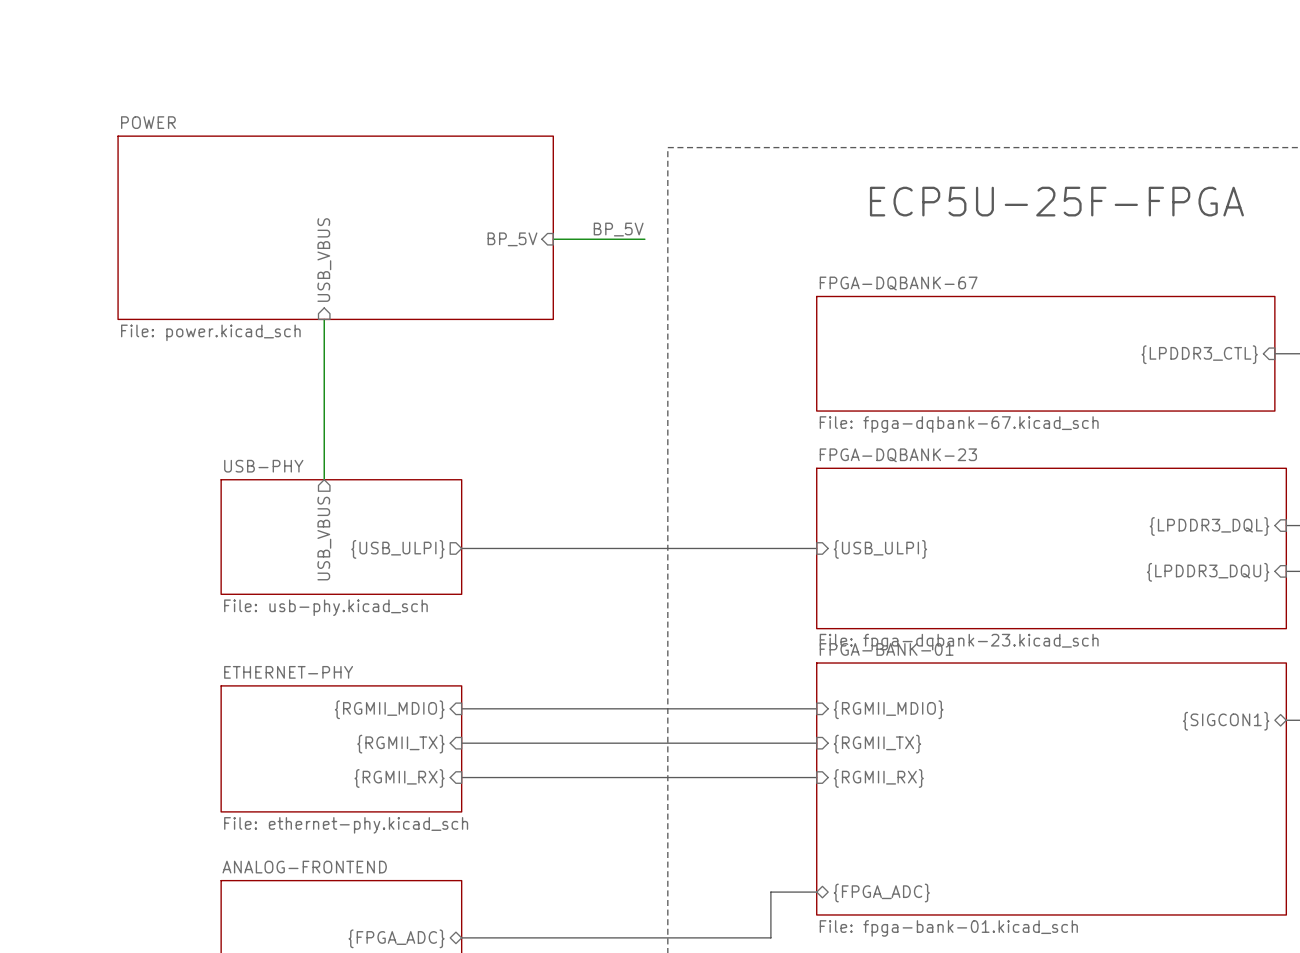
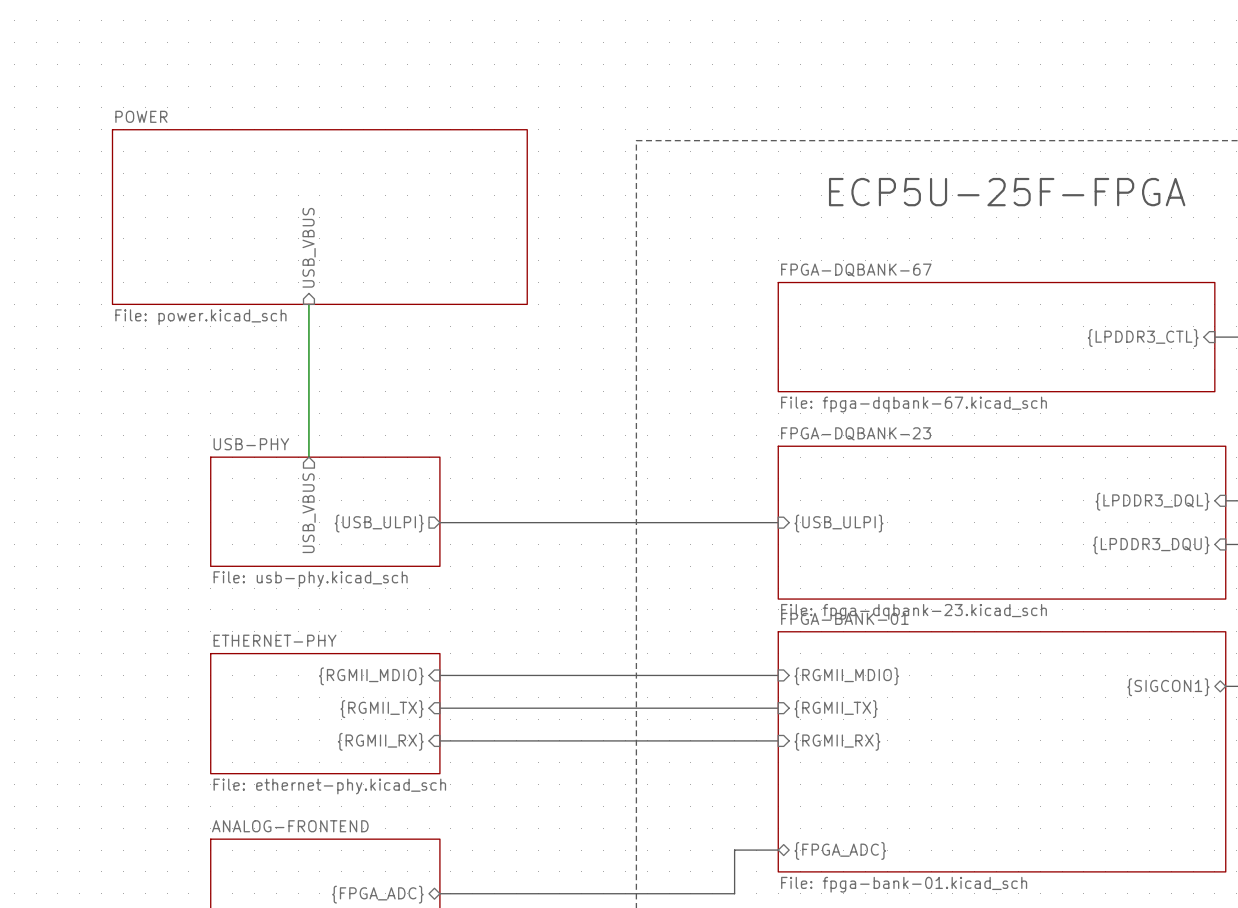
label: BP_5V (618, 229) -> none
sheet pin: BP_5V (512, 239) -> none
wire: (553, 239) (644, 239) -> none

